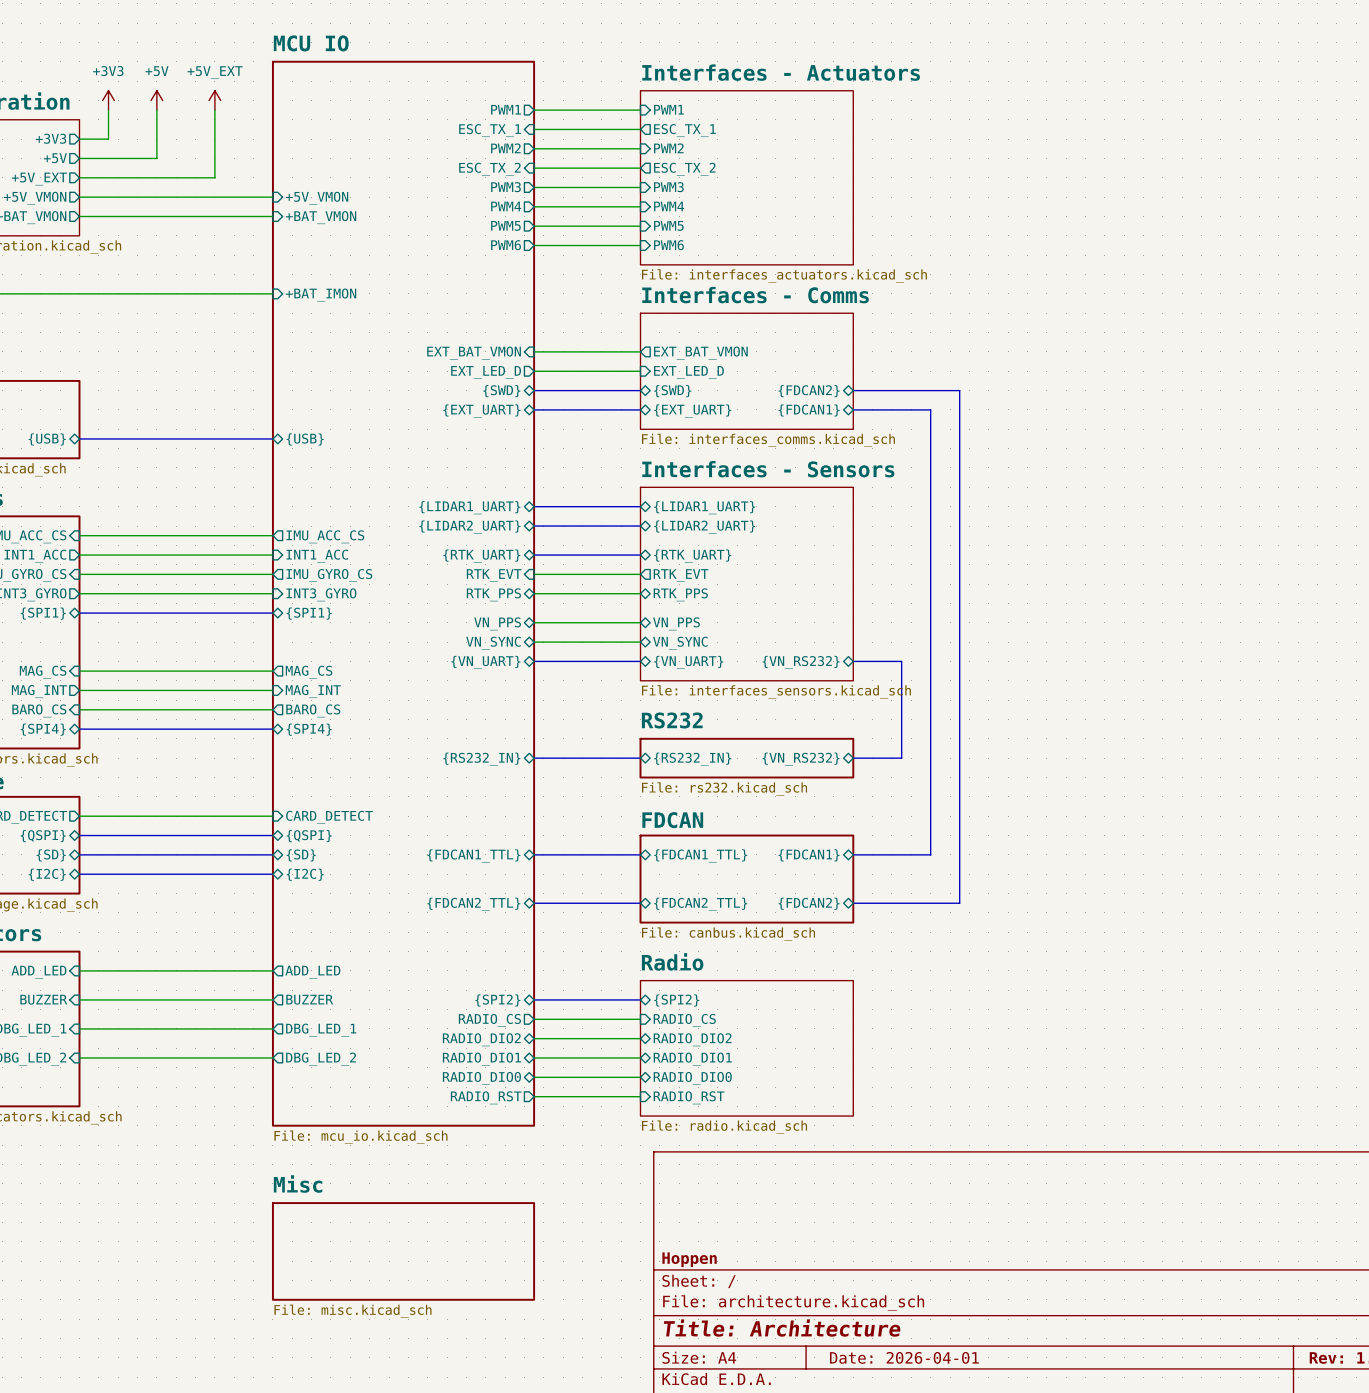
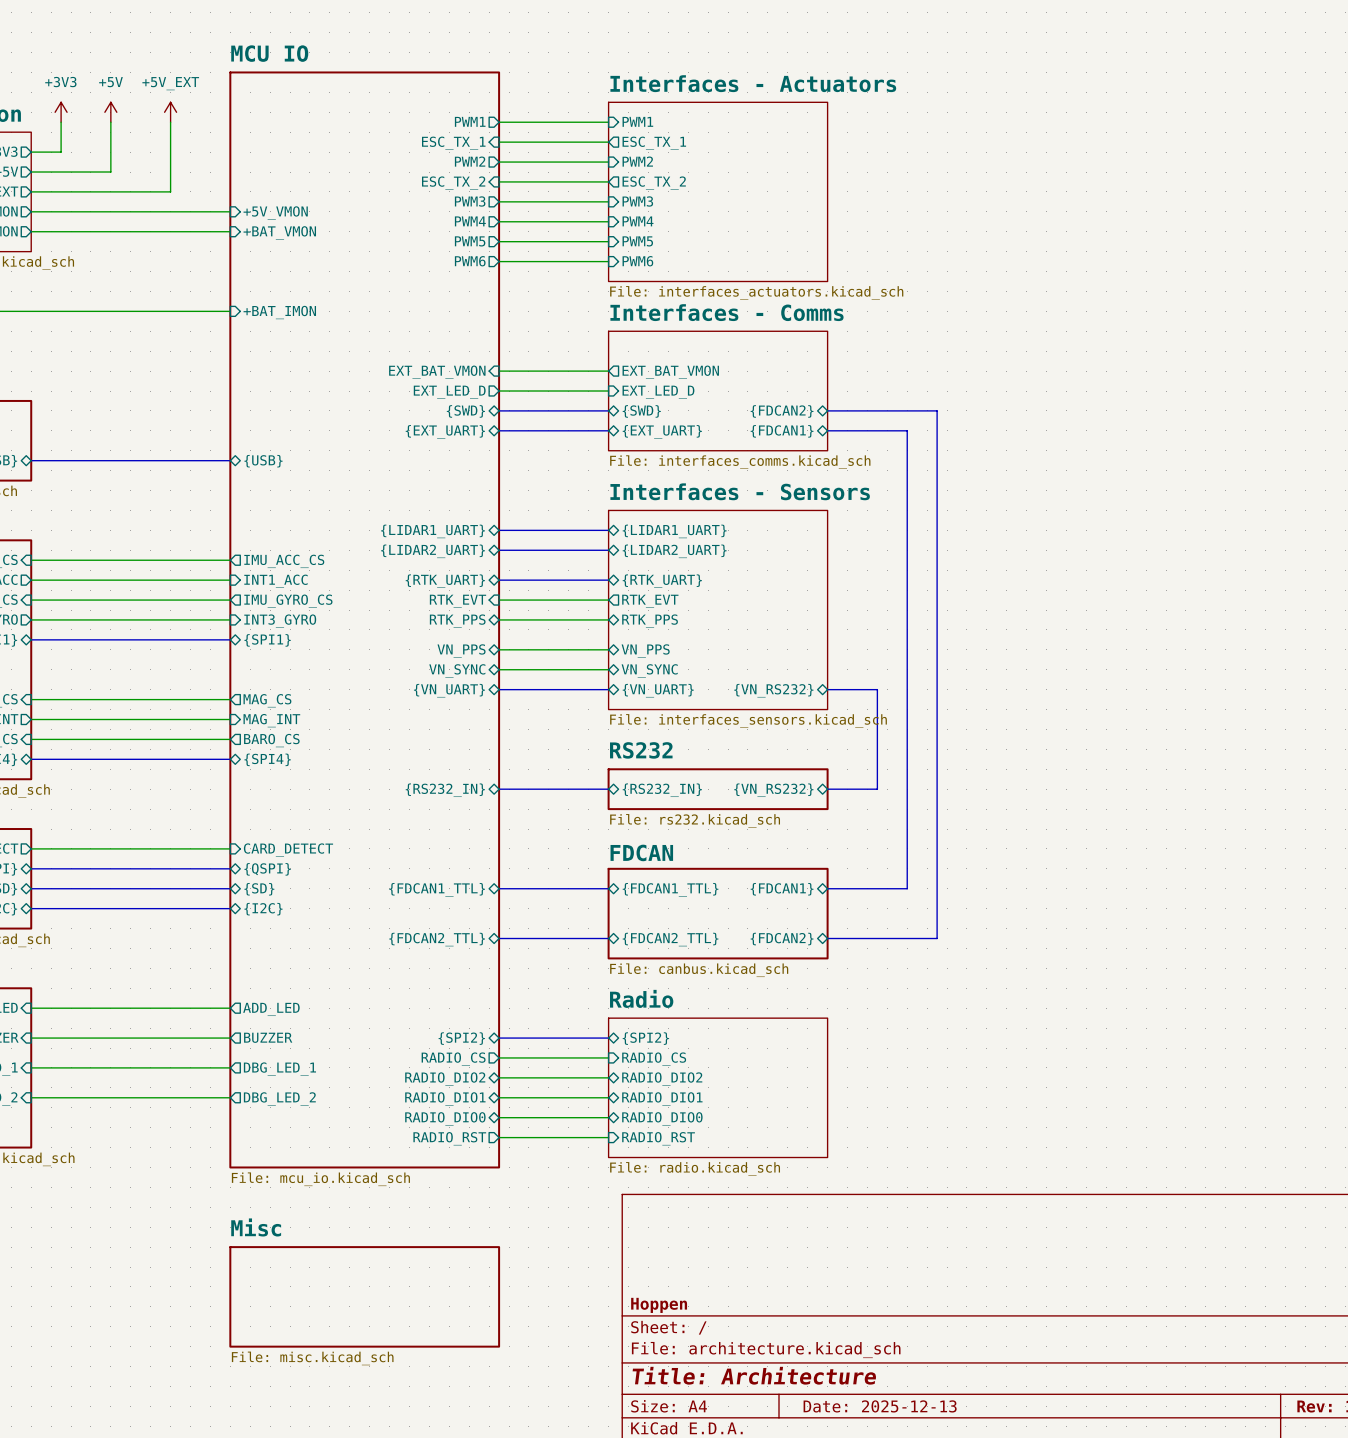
title block: Date: 2026-04-01 (904, 1357) -> Date: 2025-12-13 (880, 1406)

